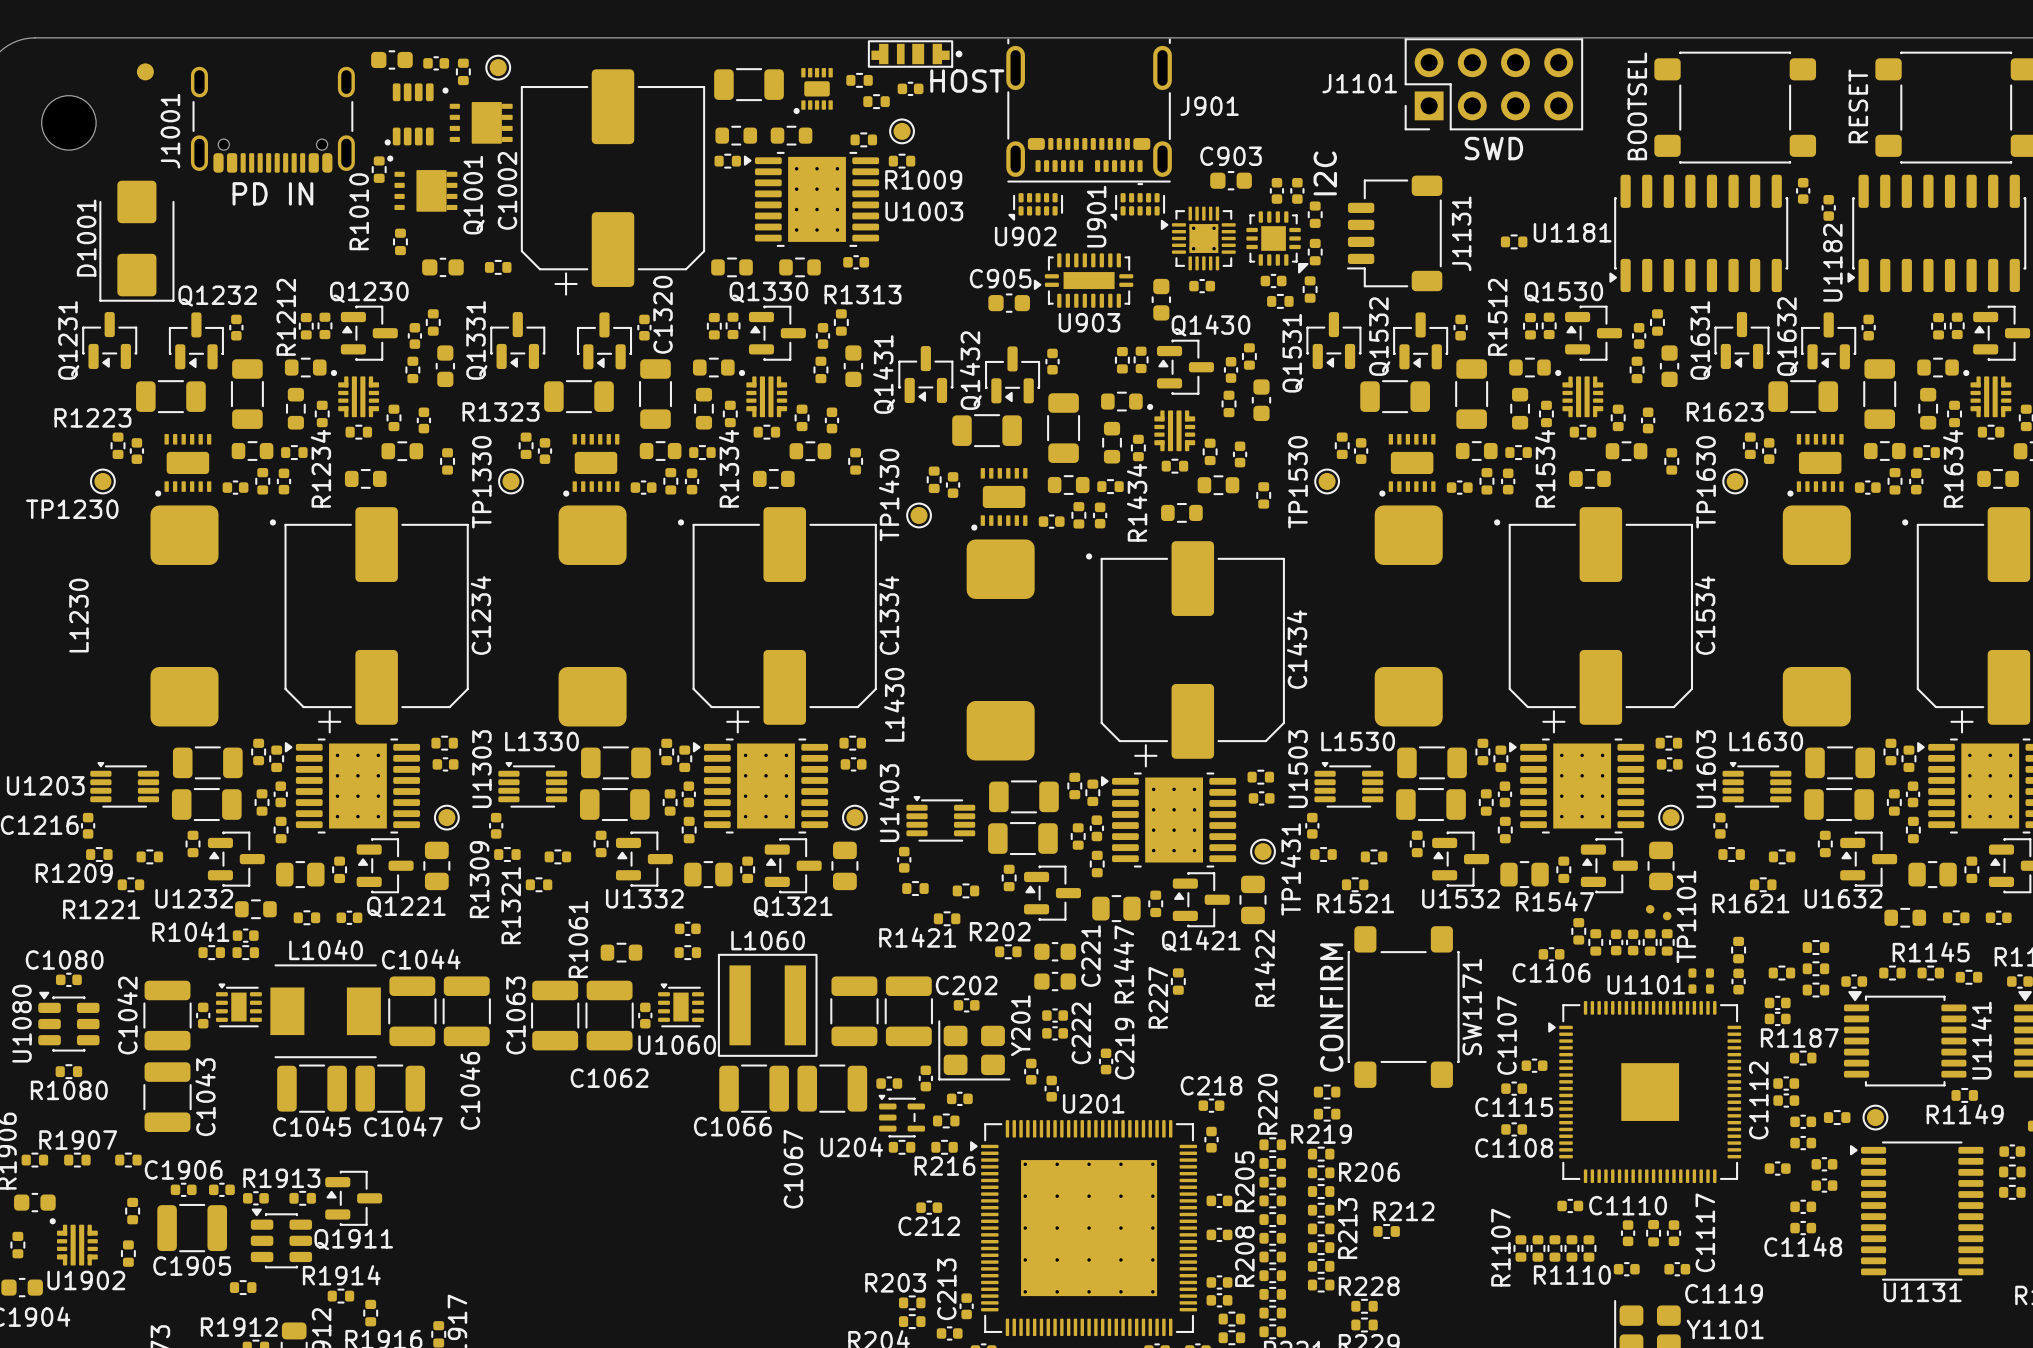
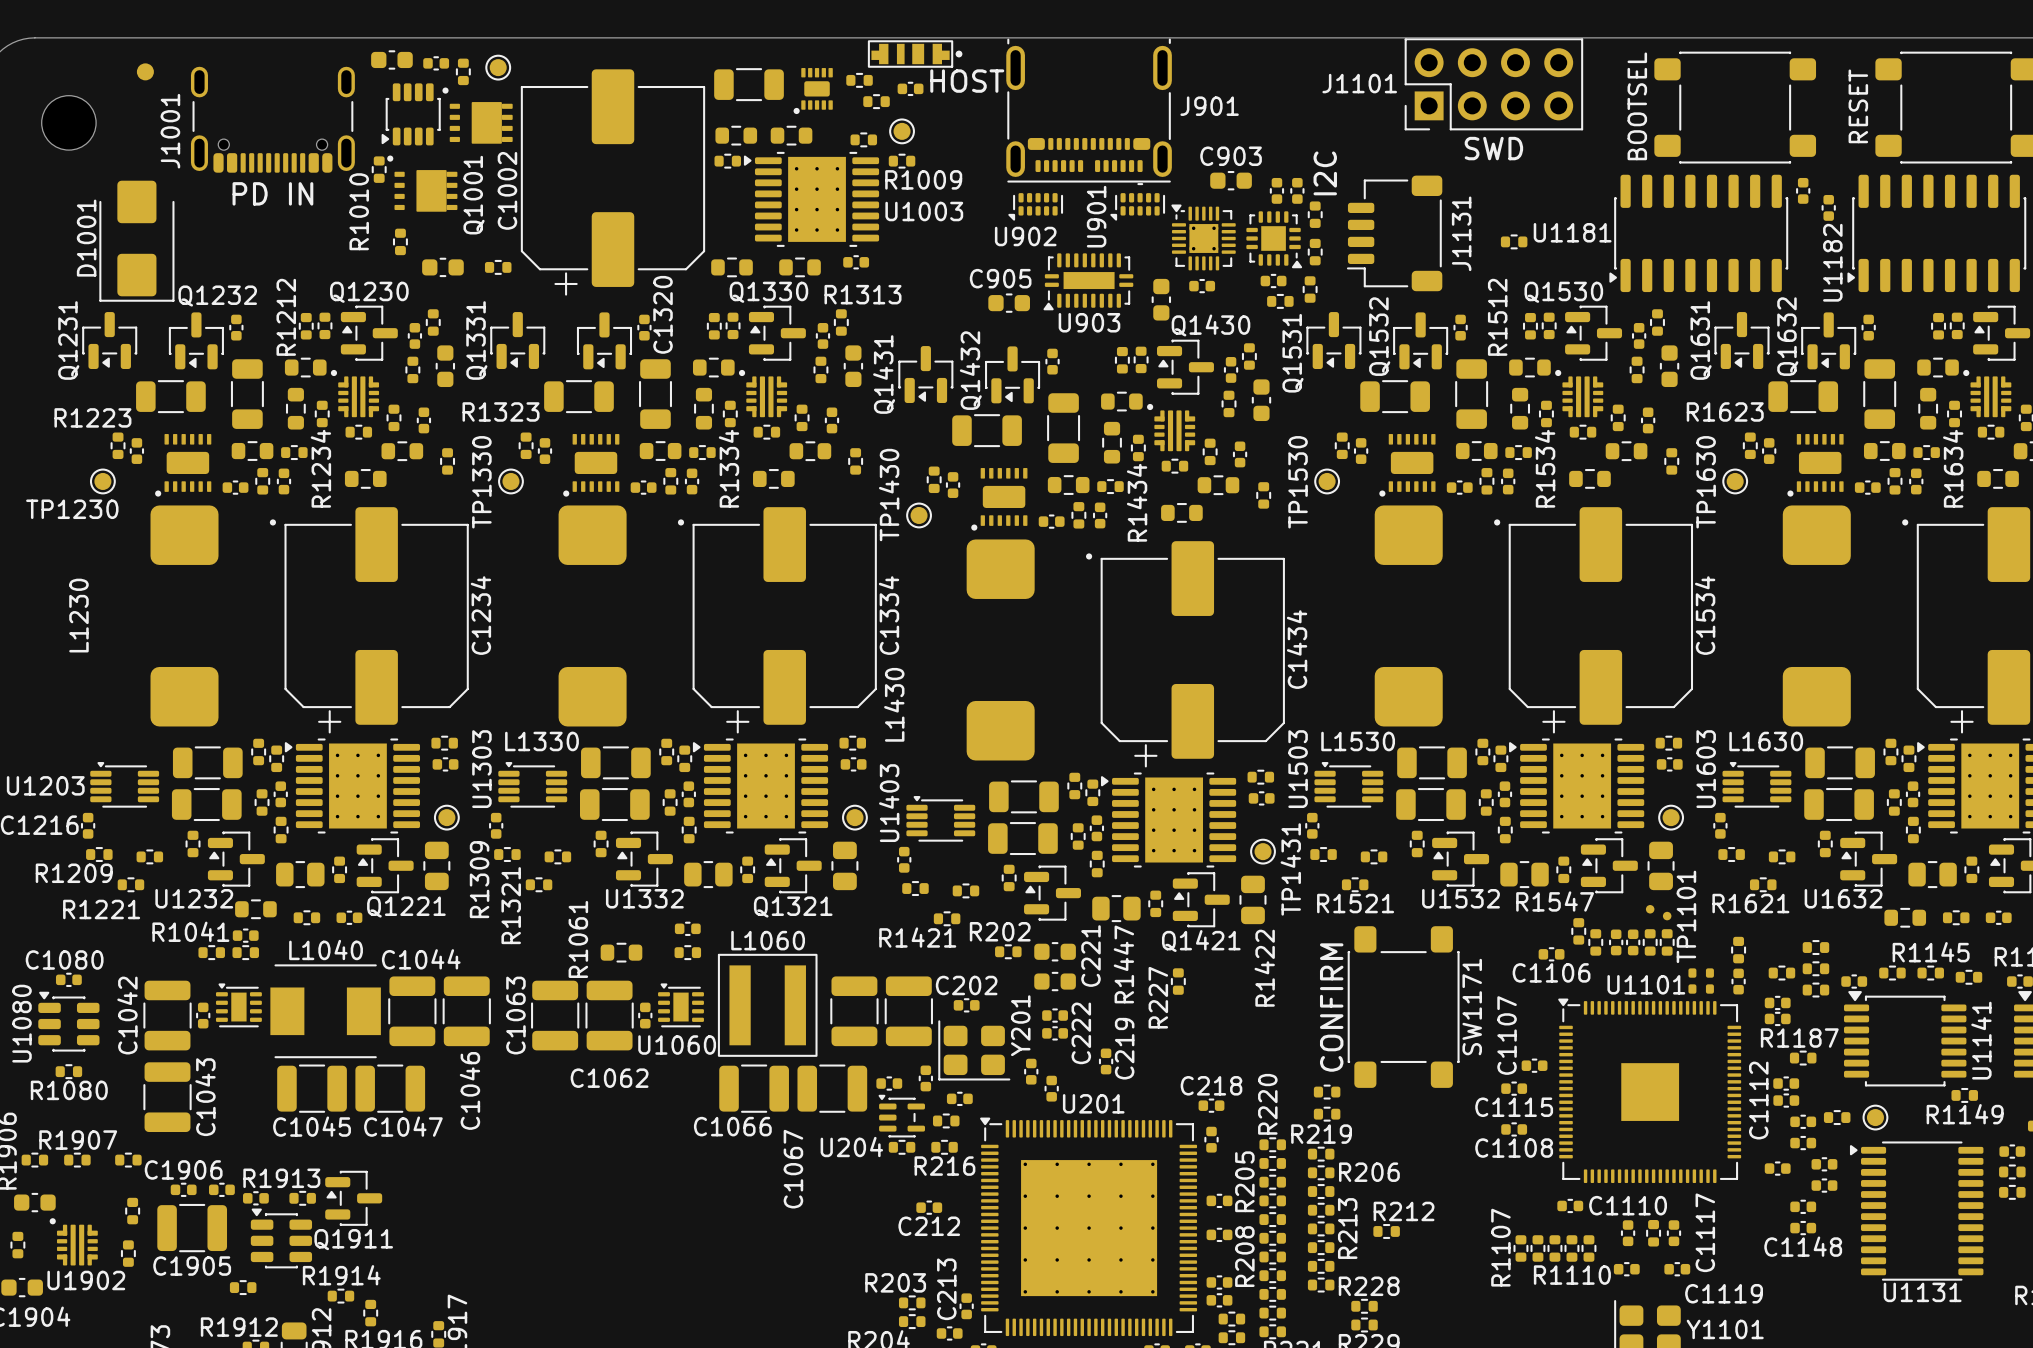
part footprint: [384, 83, 434, 146] -> [381, 83, 441, 146]
part footprint: [1160, 206, 1236, 271] -> [1171, 204, 1236, 271]
part footprint: [1246, 211, 1309, 274] -> [1246, 211, 1303, 269]
U903 footprint: [1033, 253, 1134, 308] -> [1043, 253, 1134, 311]
U1101 footprint: [1548, 1001, 1742, 1184] -> [1558, 998, 1742, 1184]
U201 footprint: [970, 1120, 1198, 1337] -> [980, 1117, 1198, 1337]

